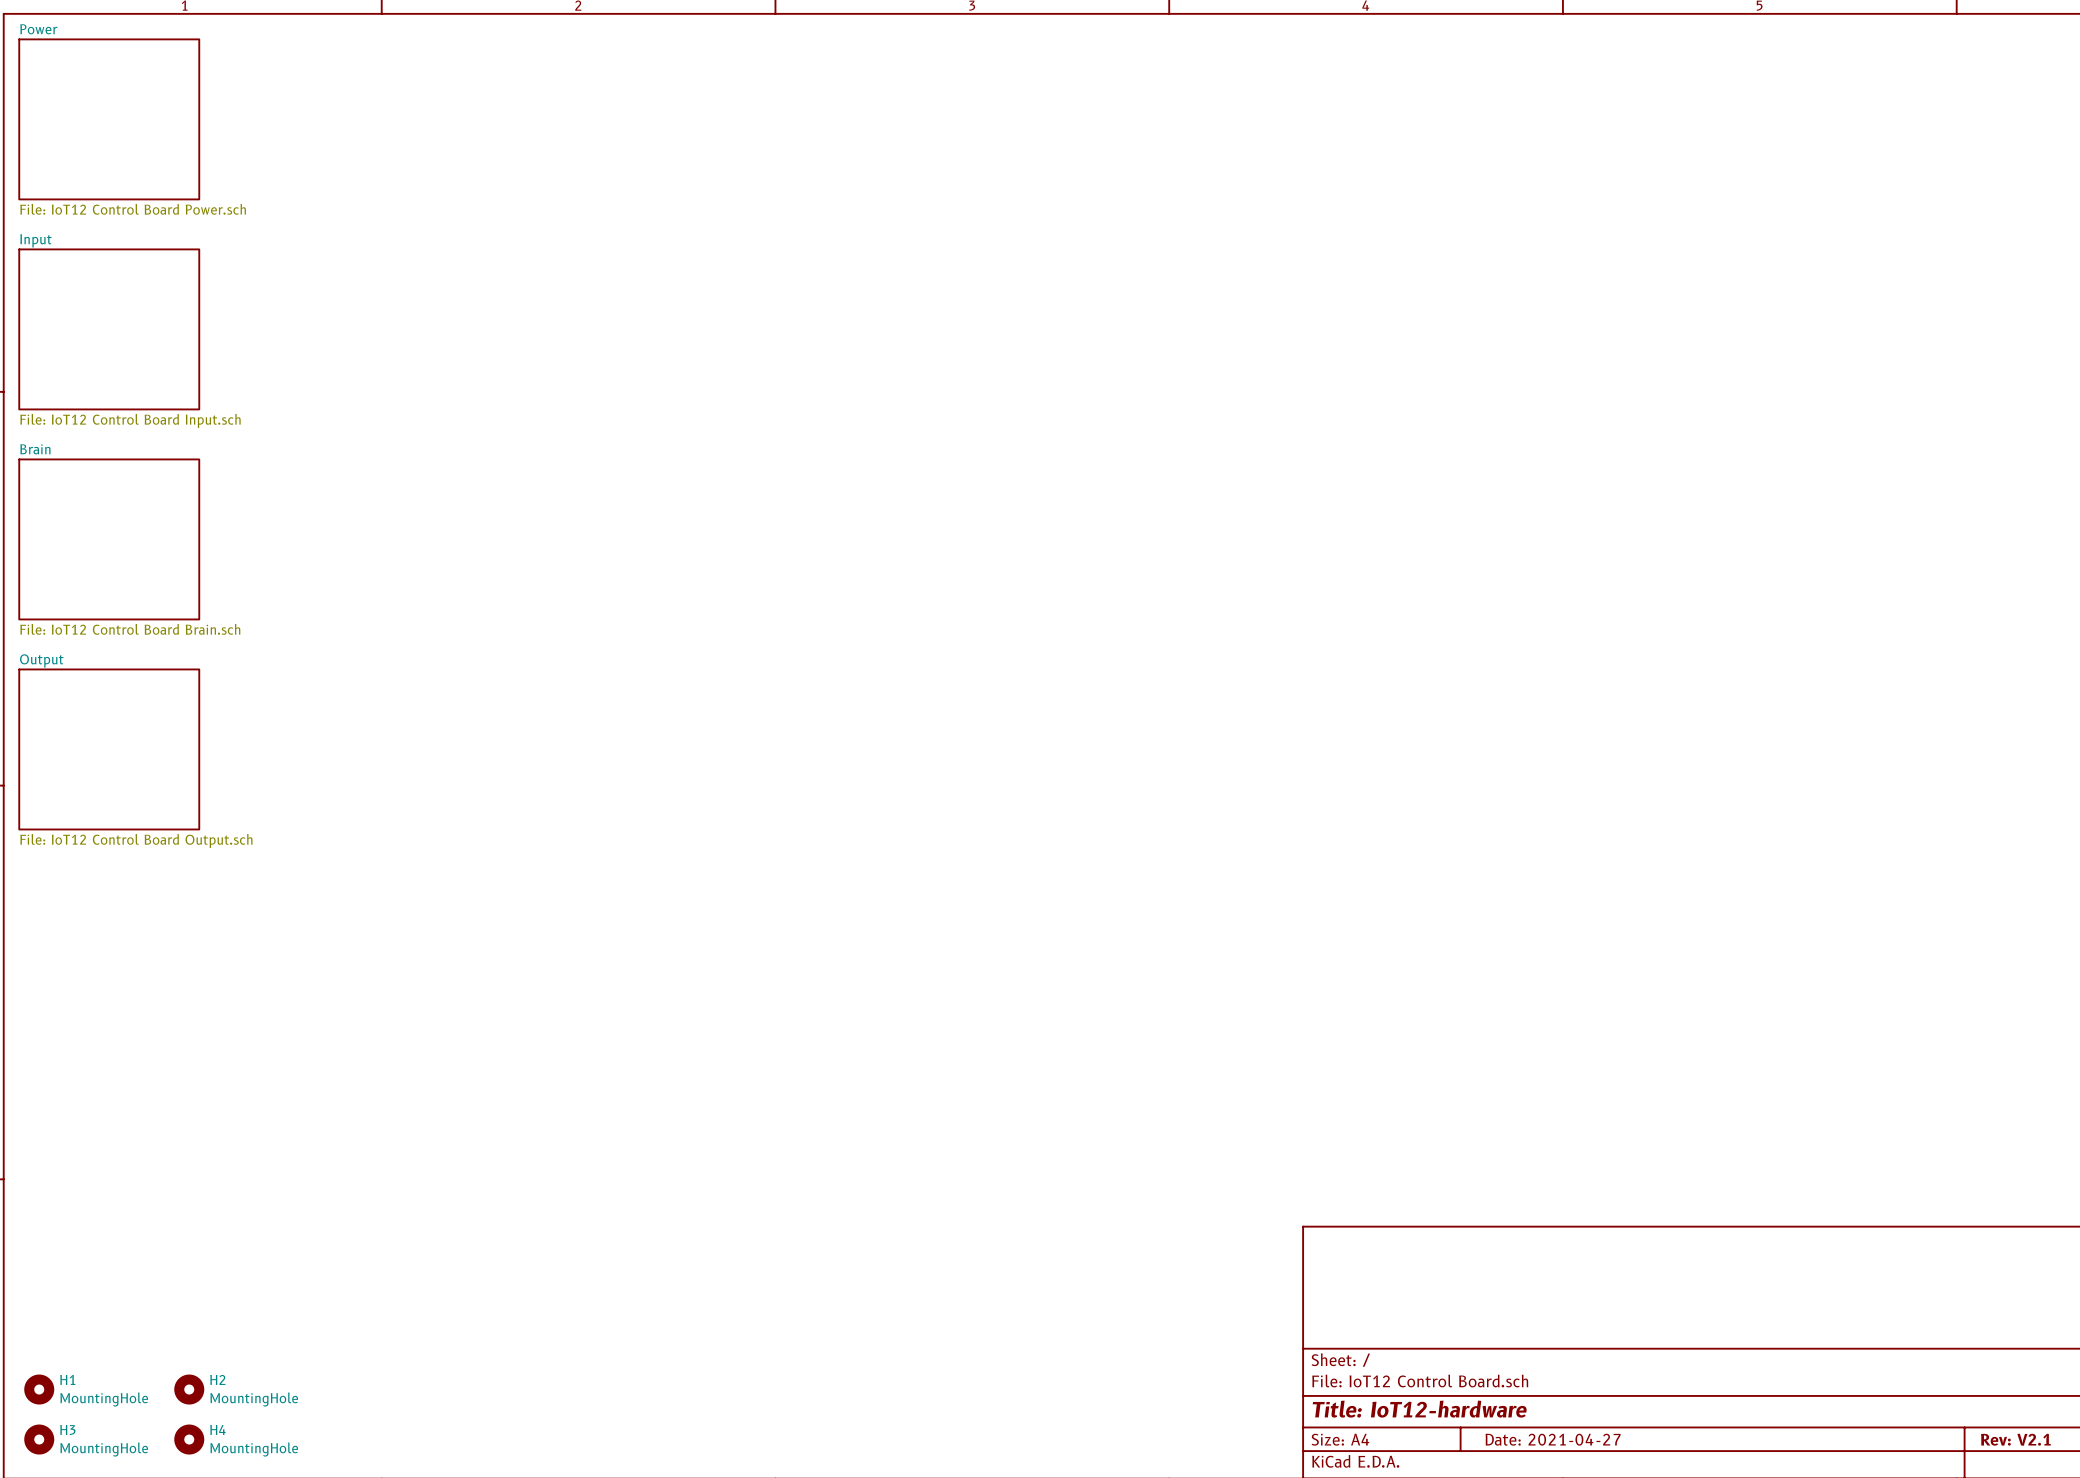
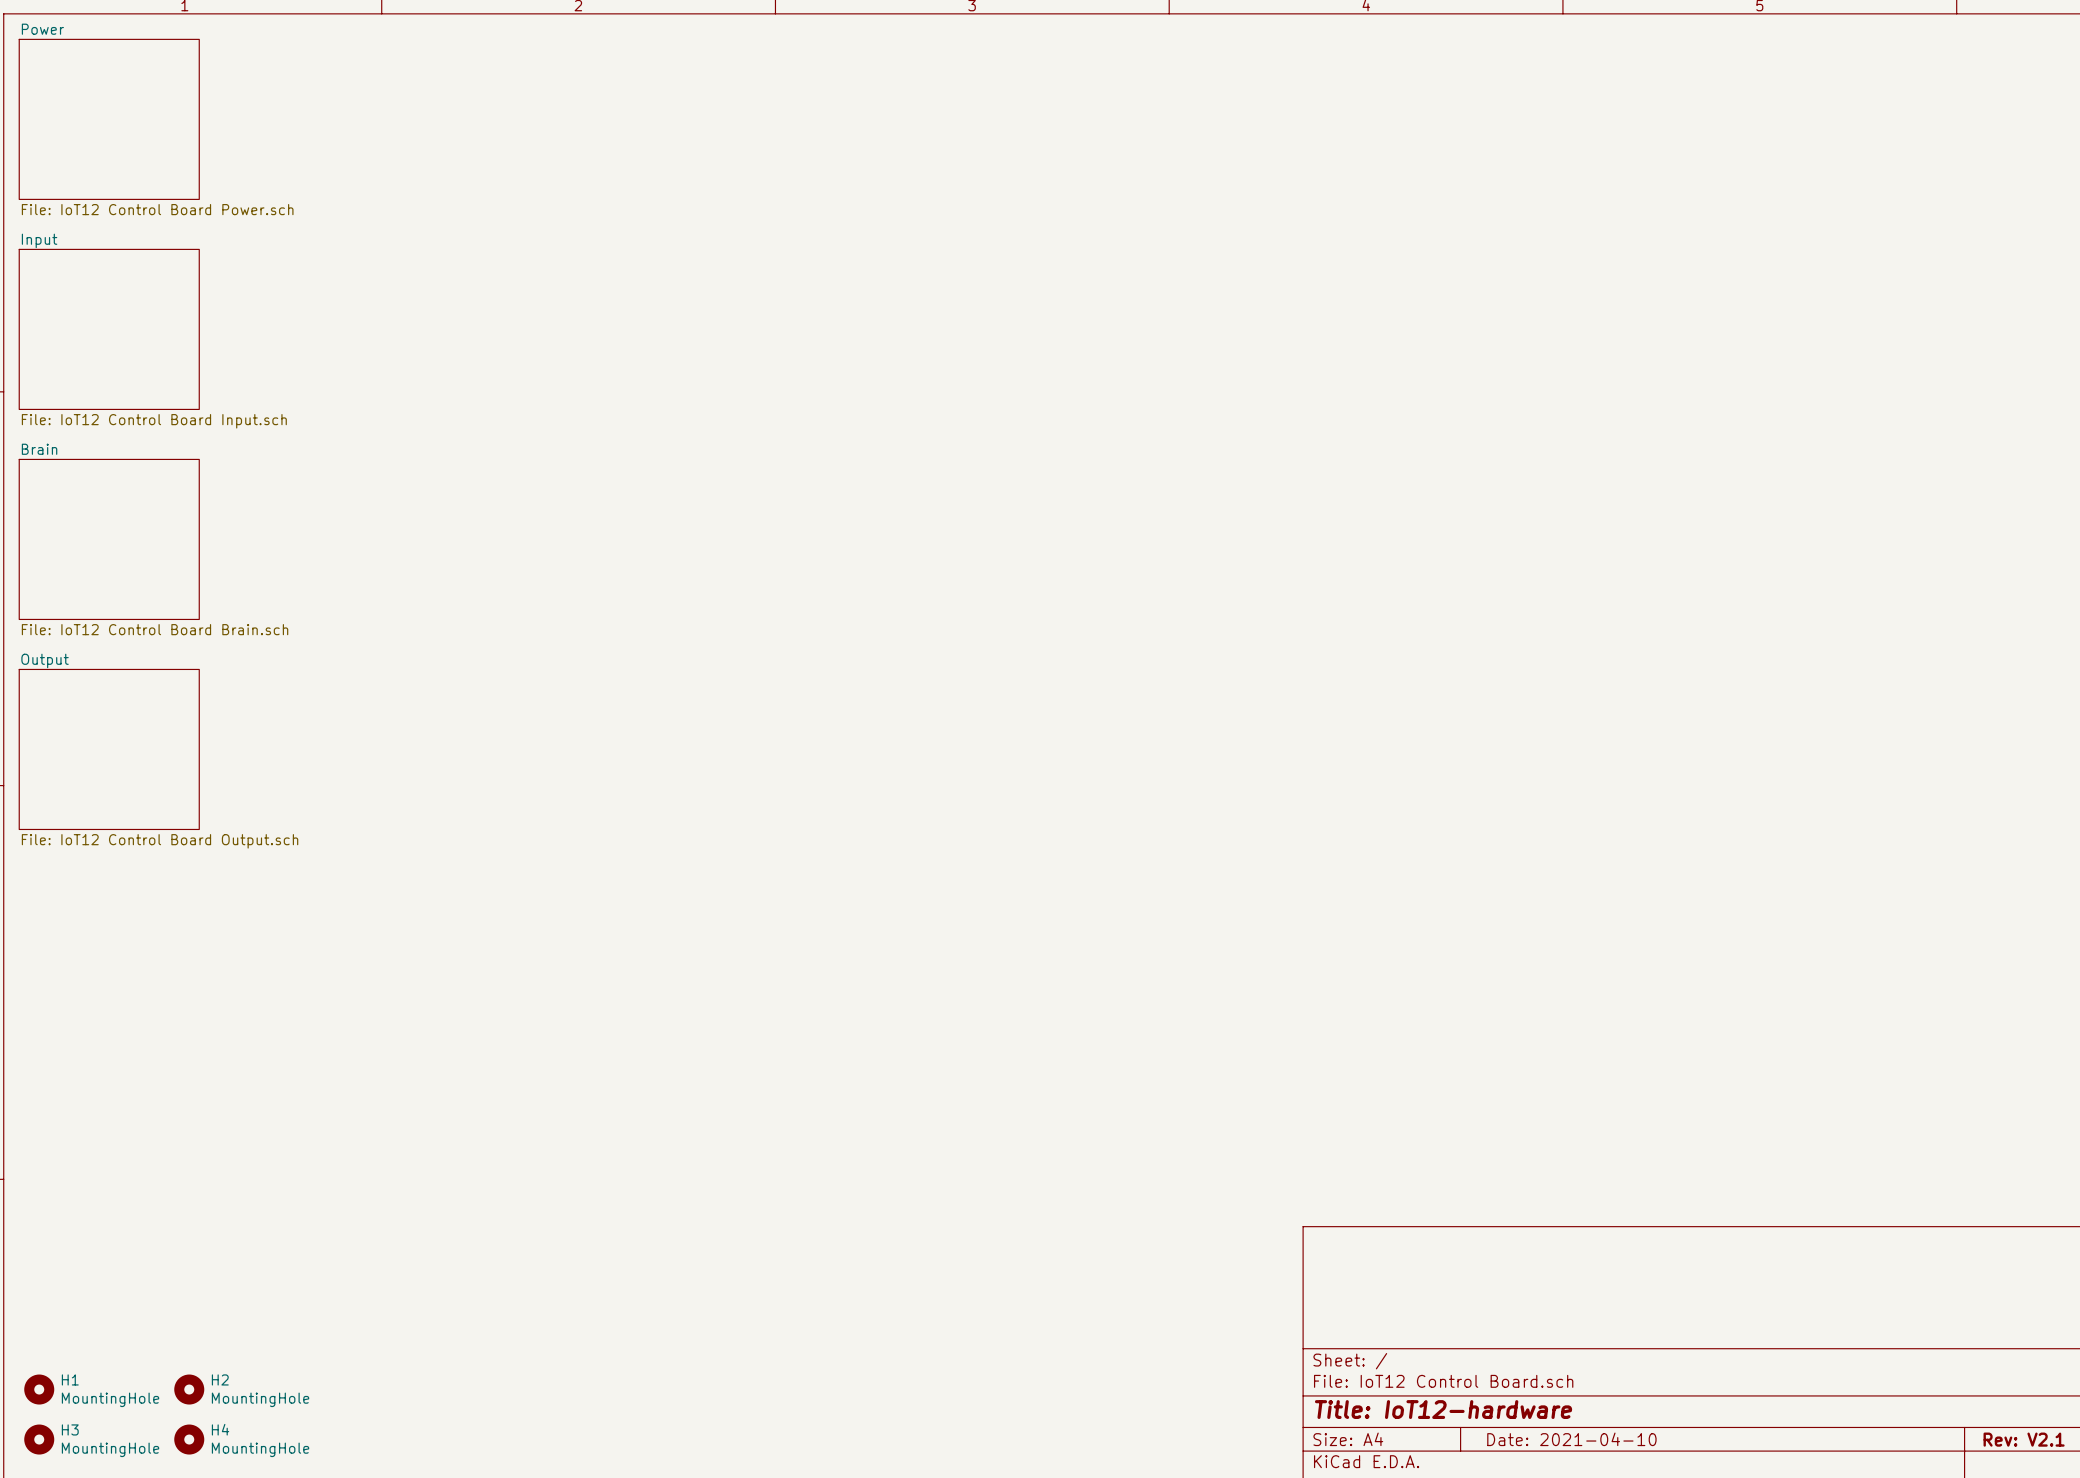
title block: Date: 2021-04-27 (1553, 1439) -> Date: 2021-04-10 (1571, 1439)

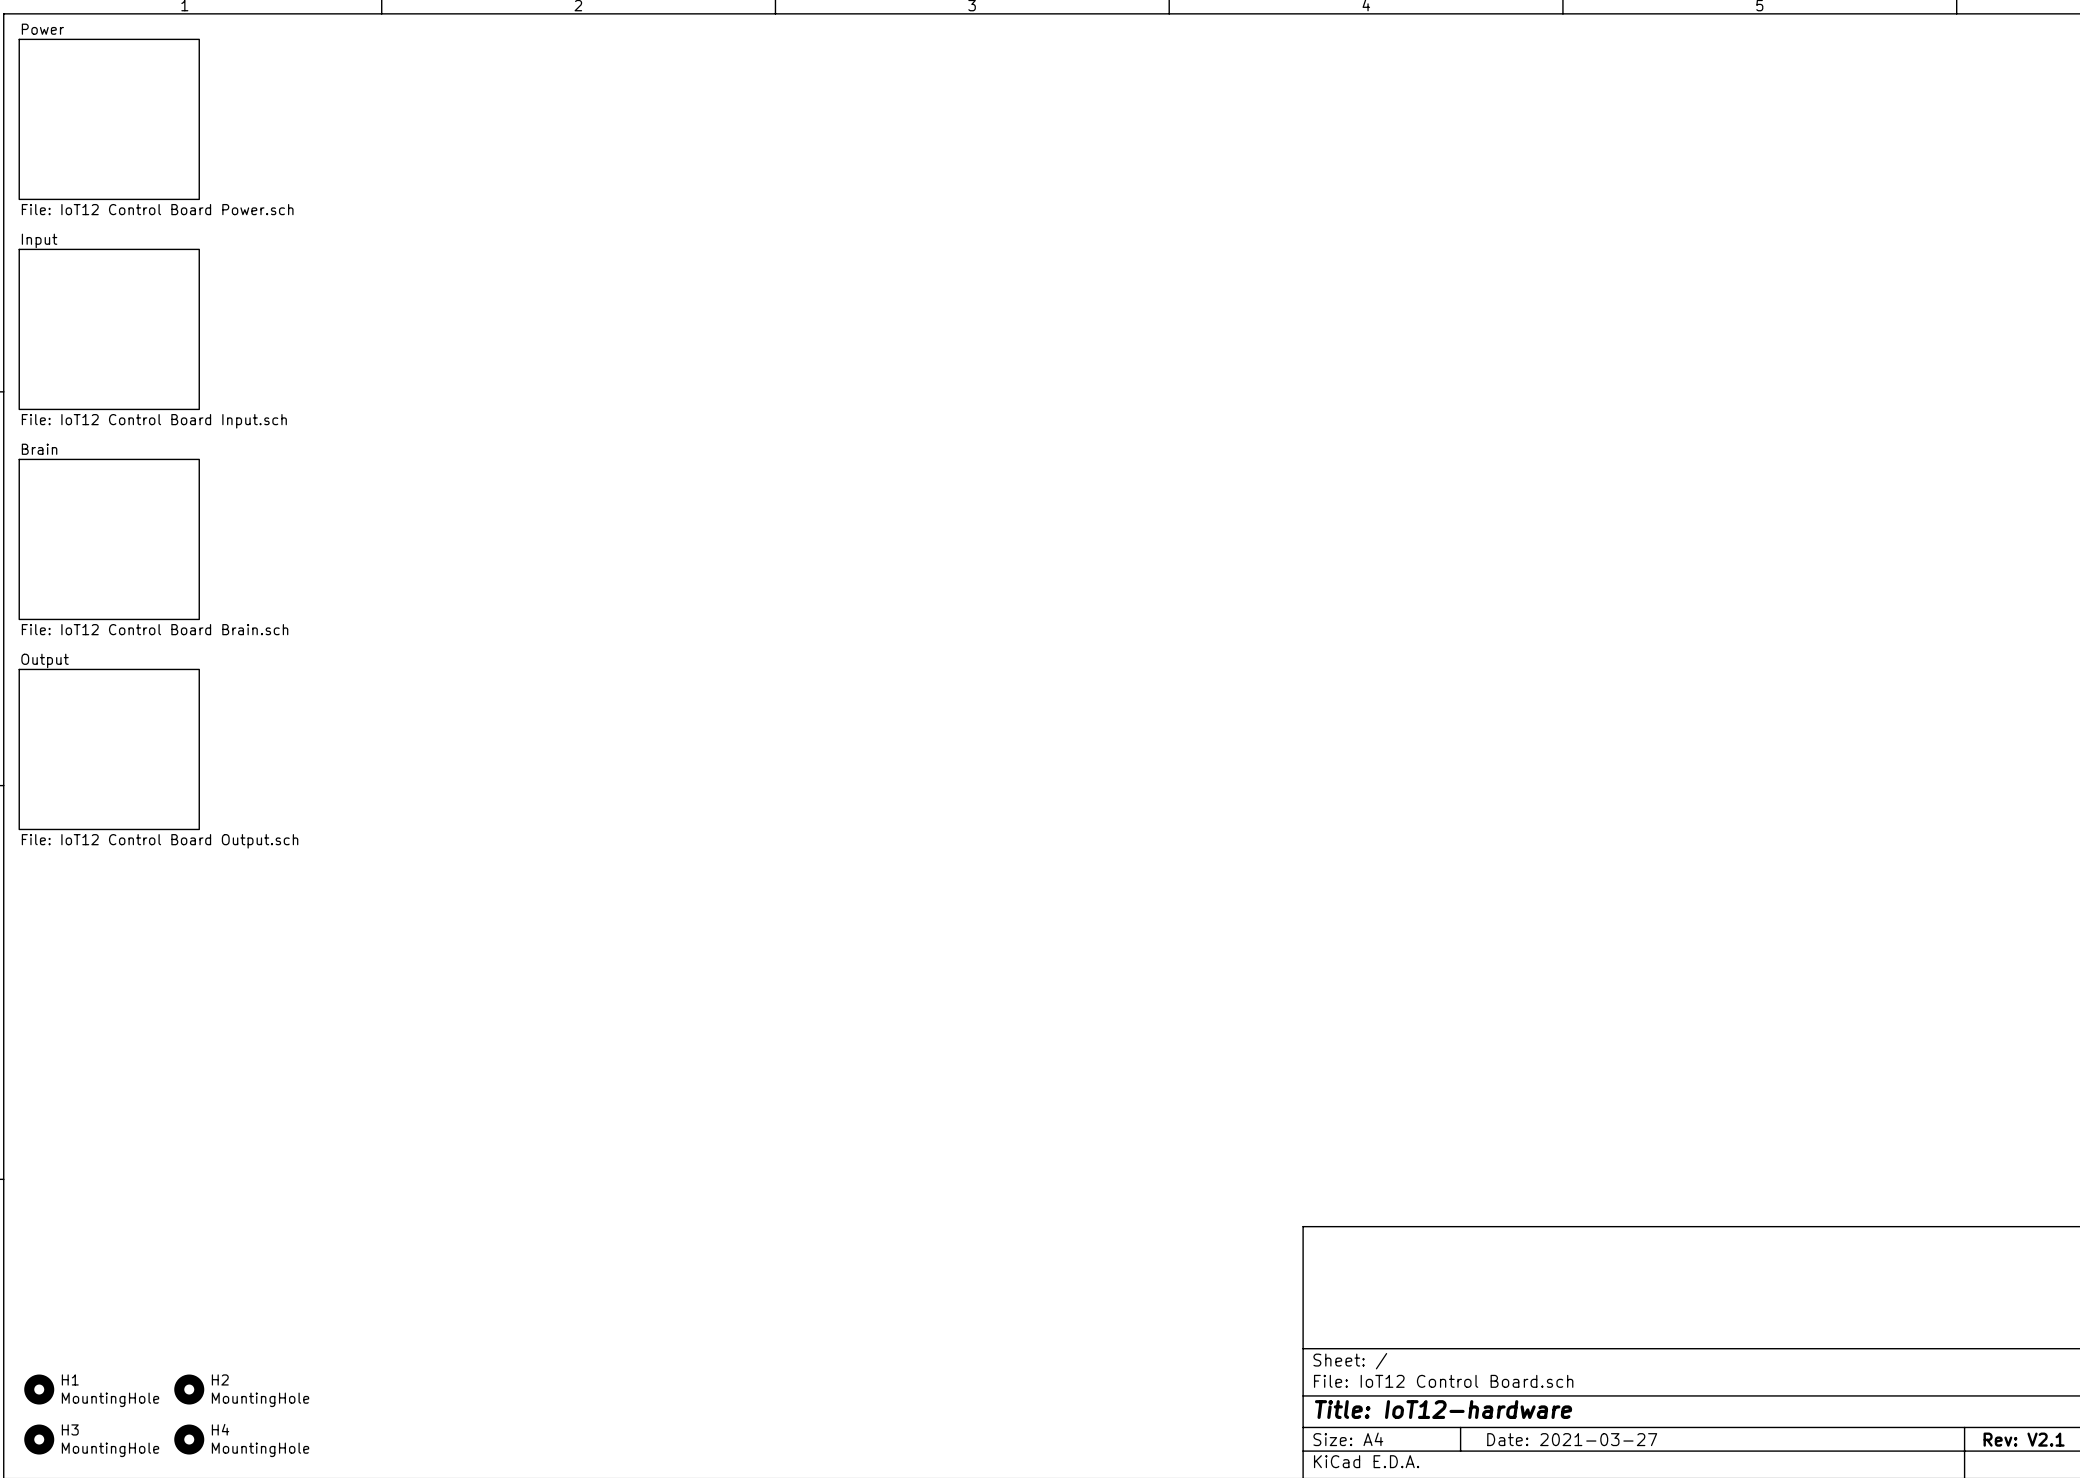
title block: Date: 2021-04-10 (1571, 1439) -> Date: 2021-03-27 (1572, 1439)

